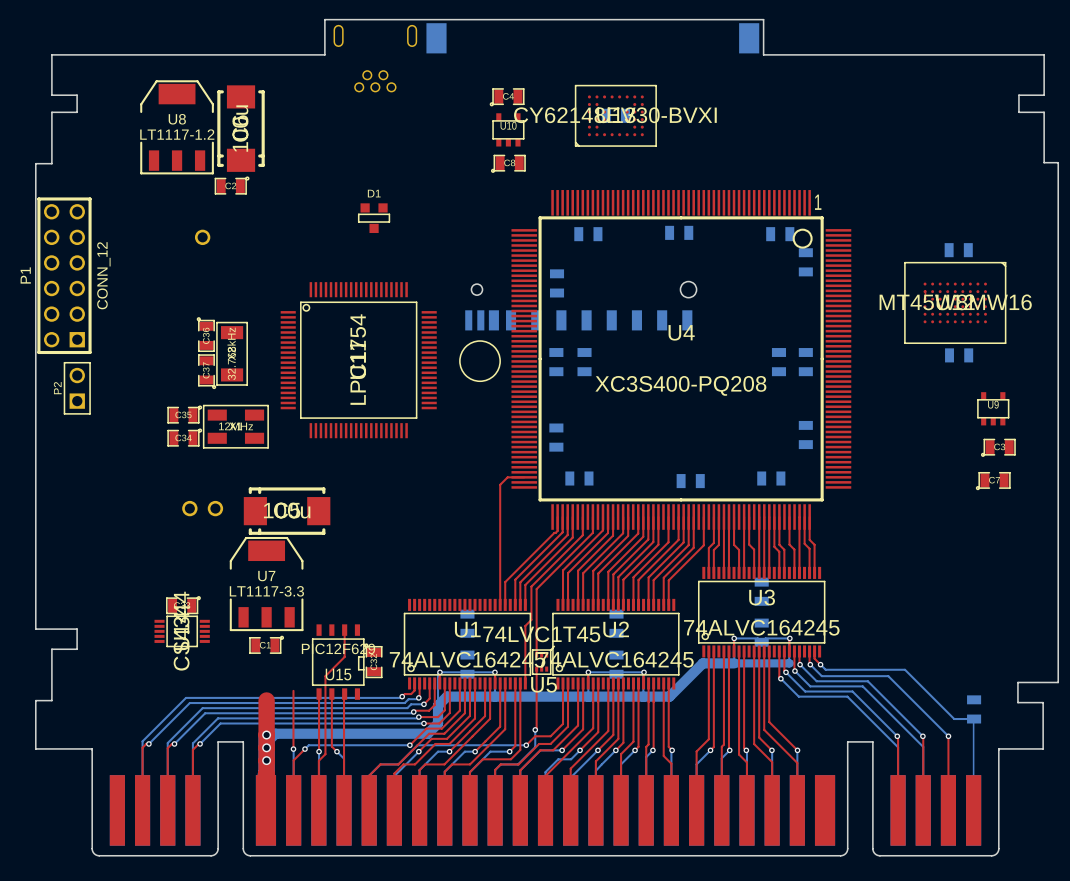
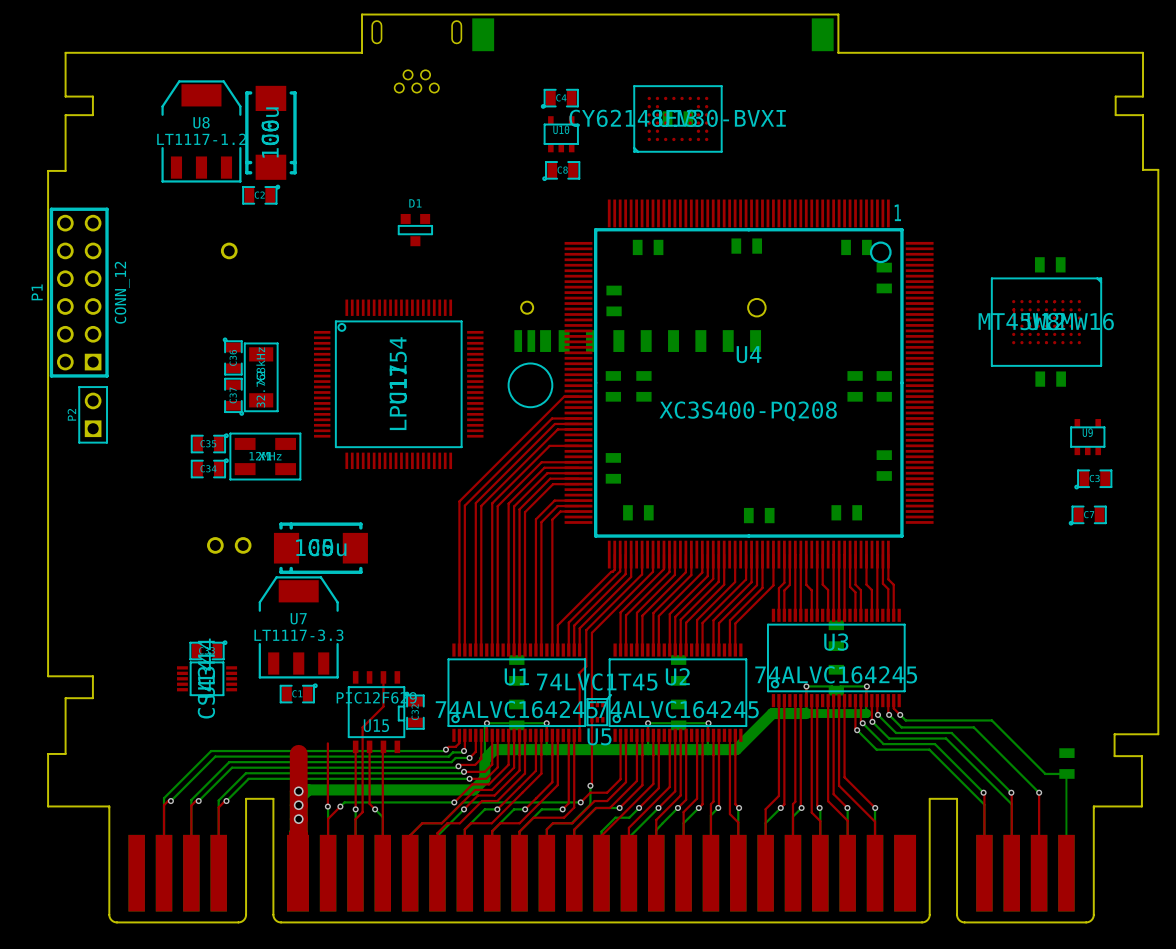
top track: none -> (578, 396) (564, 396) (459, 501) (459, 650)
top track: none -> (578, 418) (552, 418) (464, 505) (464, 650)
top track: none -> (578, 423) (554, 423) (475, 503) (475, 650)
top track: none -> (578, 429) (557, 429) (481, 505) (481, 650)
top track: none -> (578, 445) (549, 445) (492, 503) (492, 650)
top track: none -> (578, 462) (541, 462) (497, 506) (497, 650)
top track: none -> (578, 467) (544, 467) (508, 503) (508, 650)
top track: none -> (578, 473) (547, 473) (514, 506) (514, 650)
top track: none -> (578, 478) (550, 478) (519, 509) (519, 650)
top track: none -> (578, 484) (553, 484) (525, 512) (525, 650)
top track: none -> (578, 500) (554, 500) (535, 519) (535, 650)
top track: none -> (578, 506) (557, 506) (541, 522) (541, 650)

